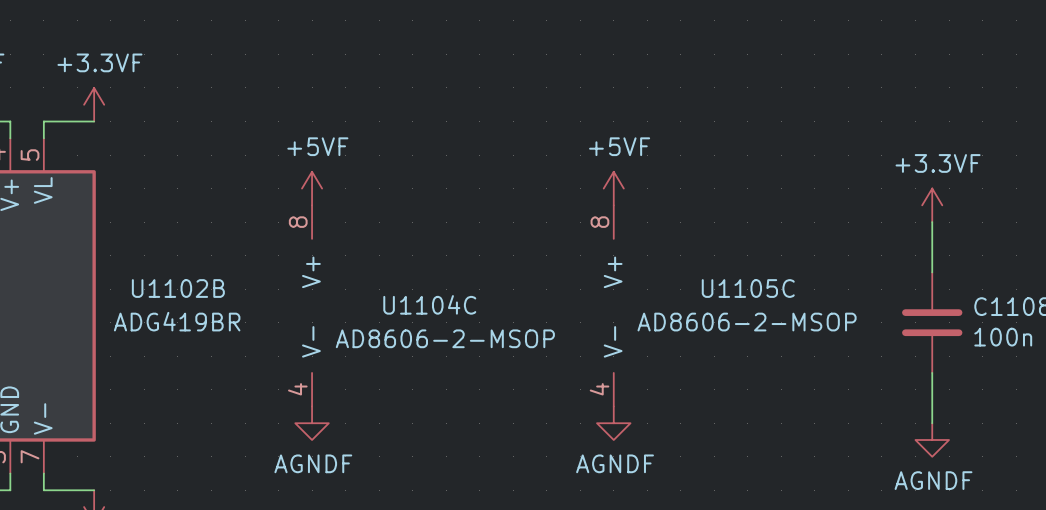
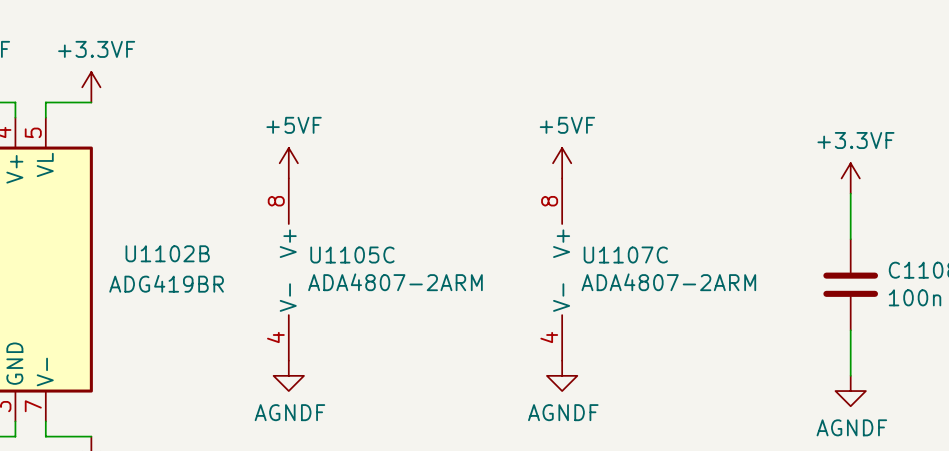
U1105C symbol: [613, 205, 614, 407] -> [288, 178, 289, 361]
U1105C name position: U1105C (748, 288) -> U1105C (352, 255)
U1104C: AD8606-2-MSOP (312, 305) -> none
U1107C: none -> ADA4807-2ARM (562, 269)
U1105C value: AD8606-2-MSOP (747, 322) -> ADA4807-2ARM (395, 282)

